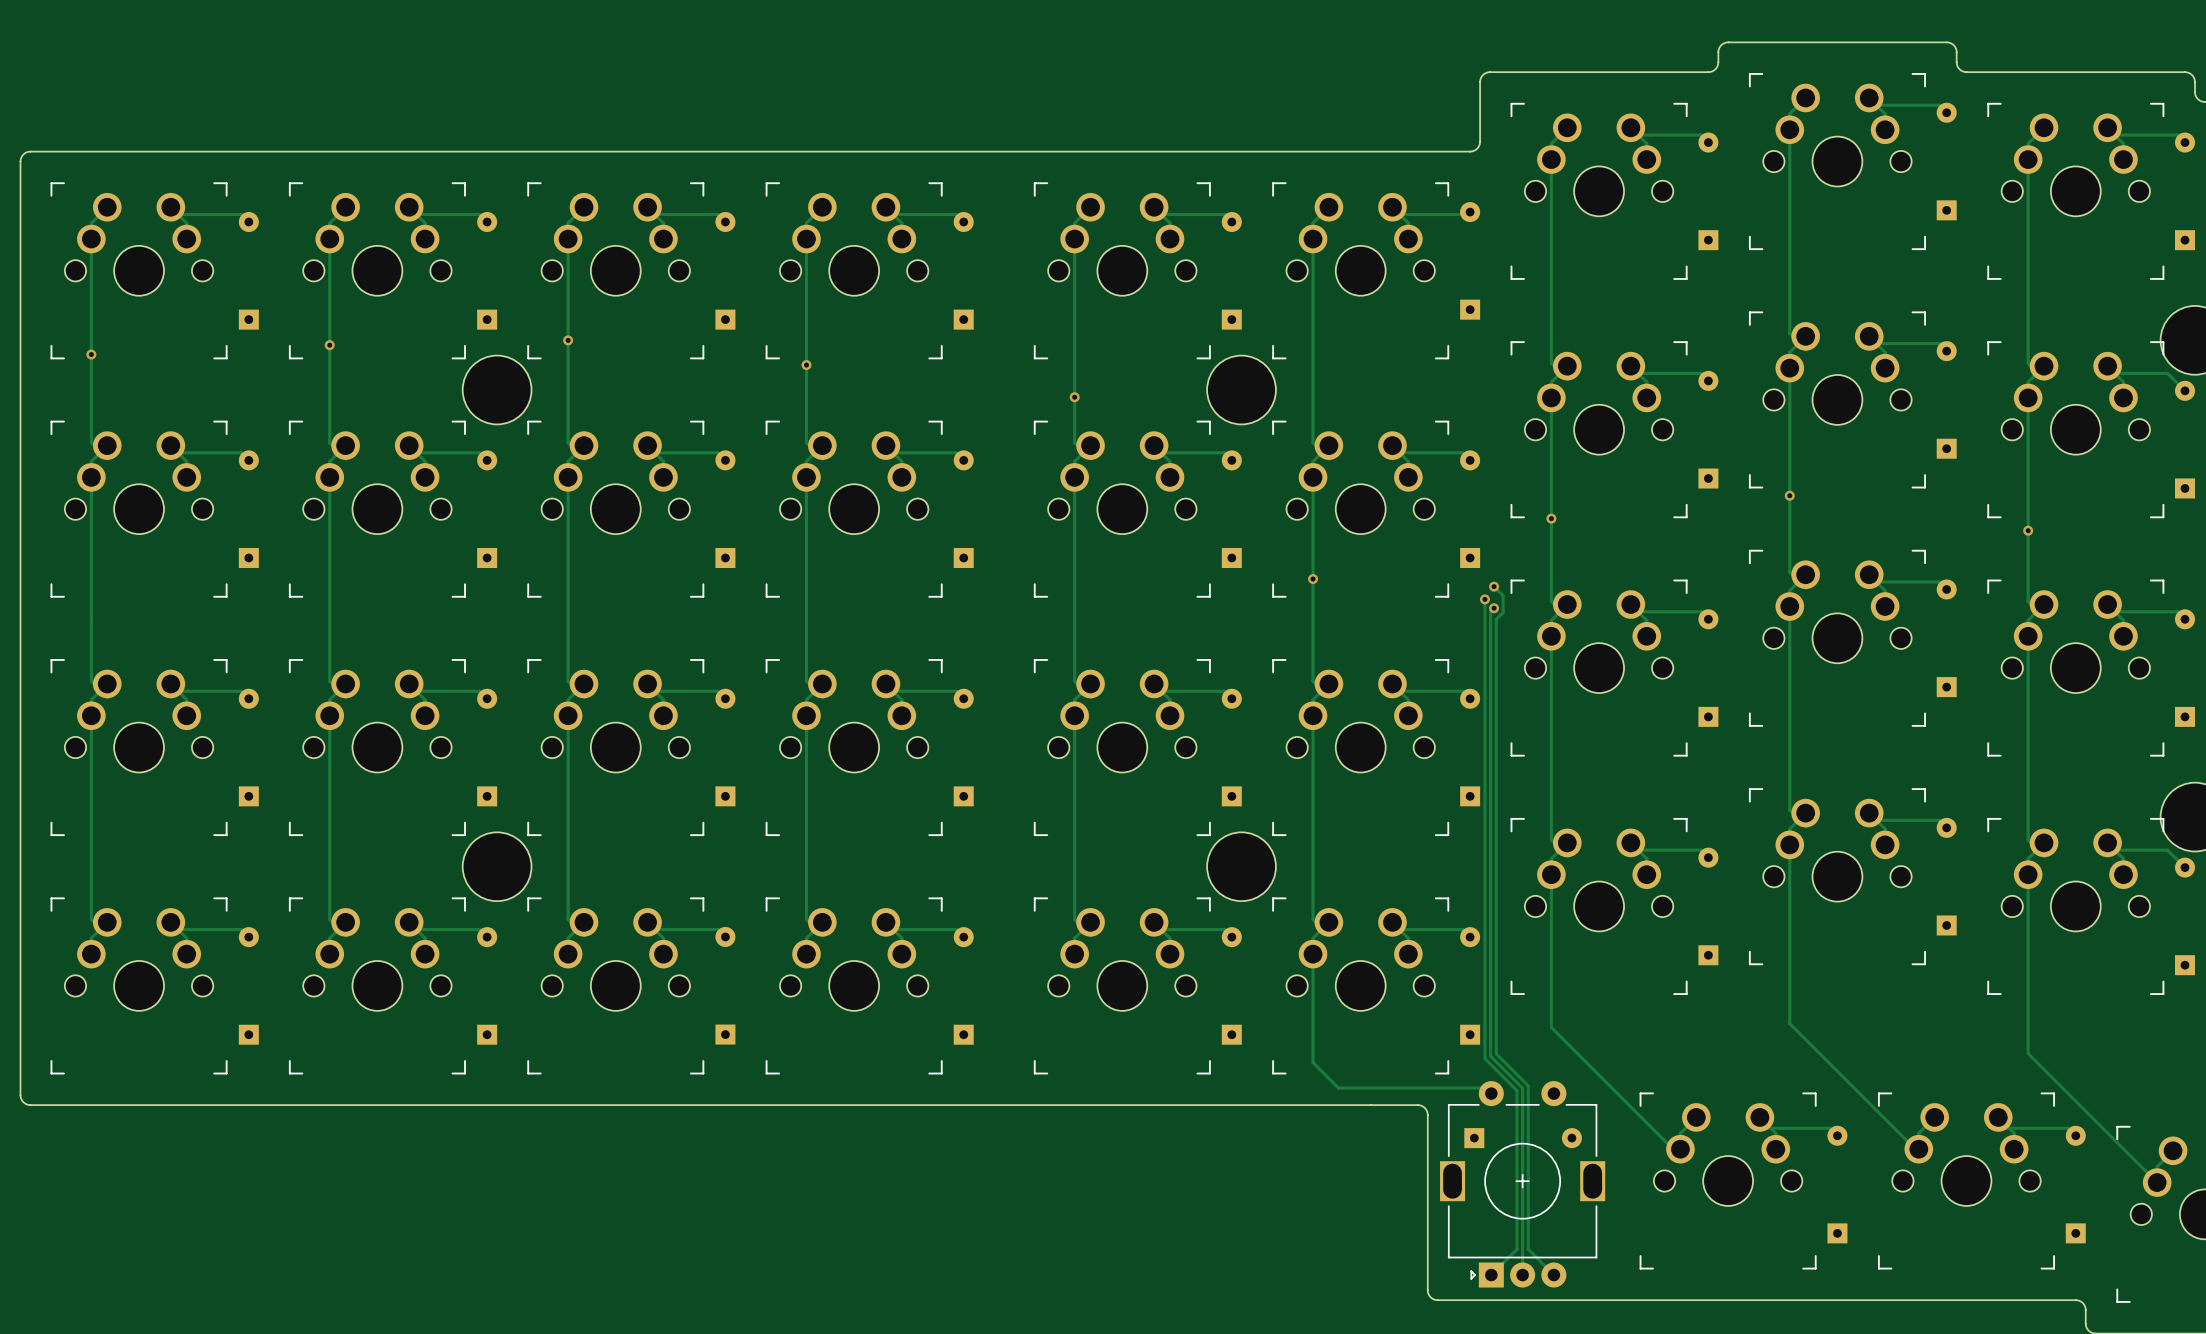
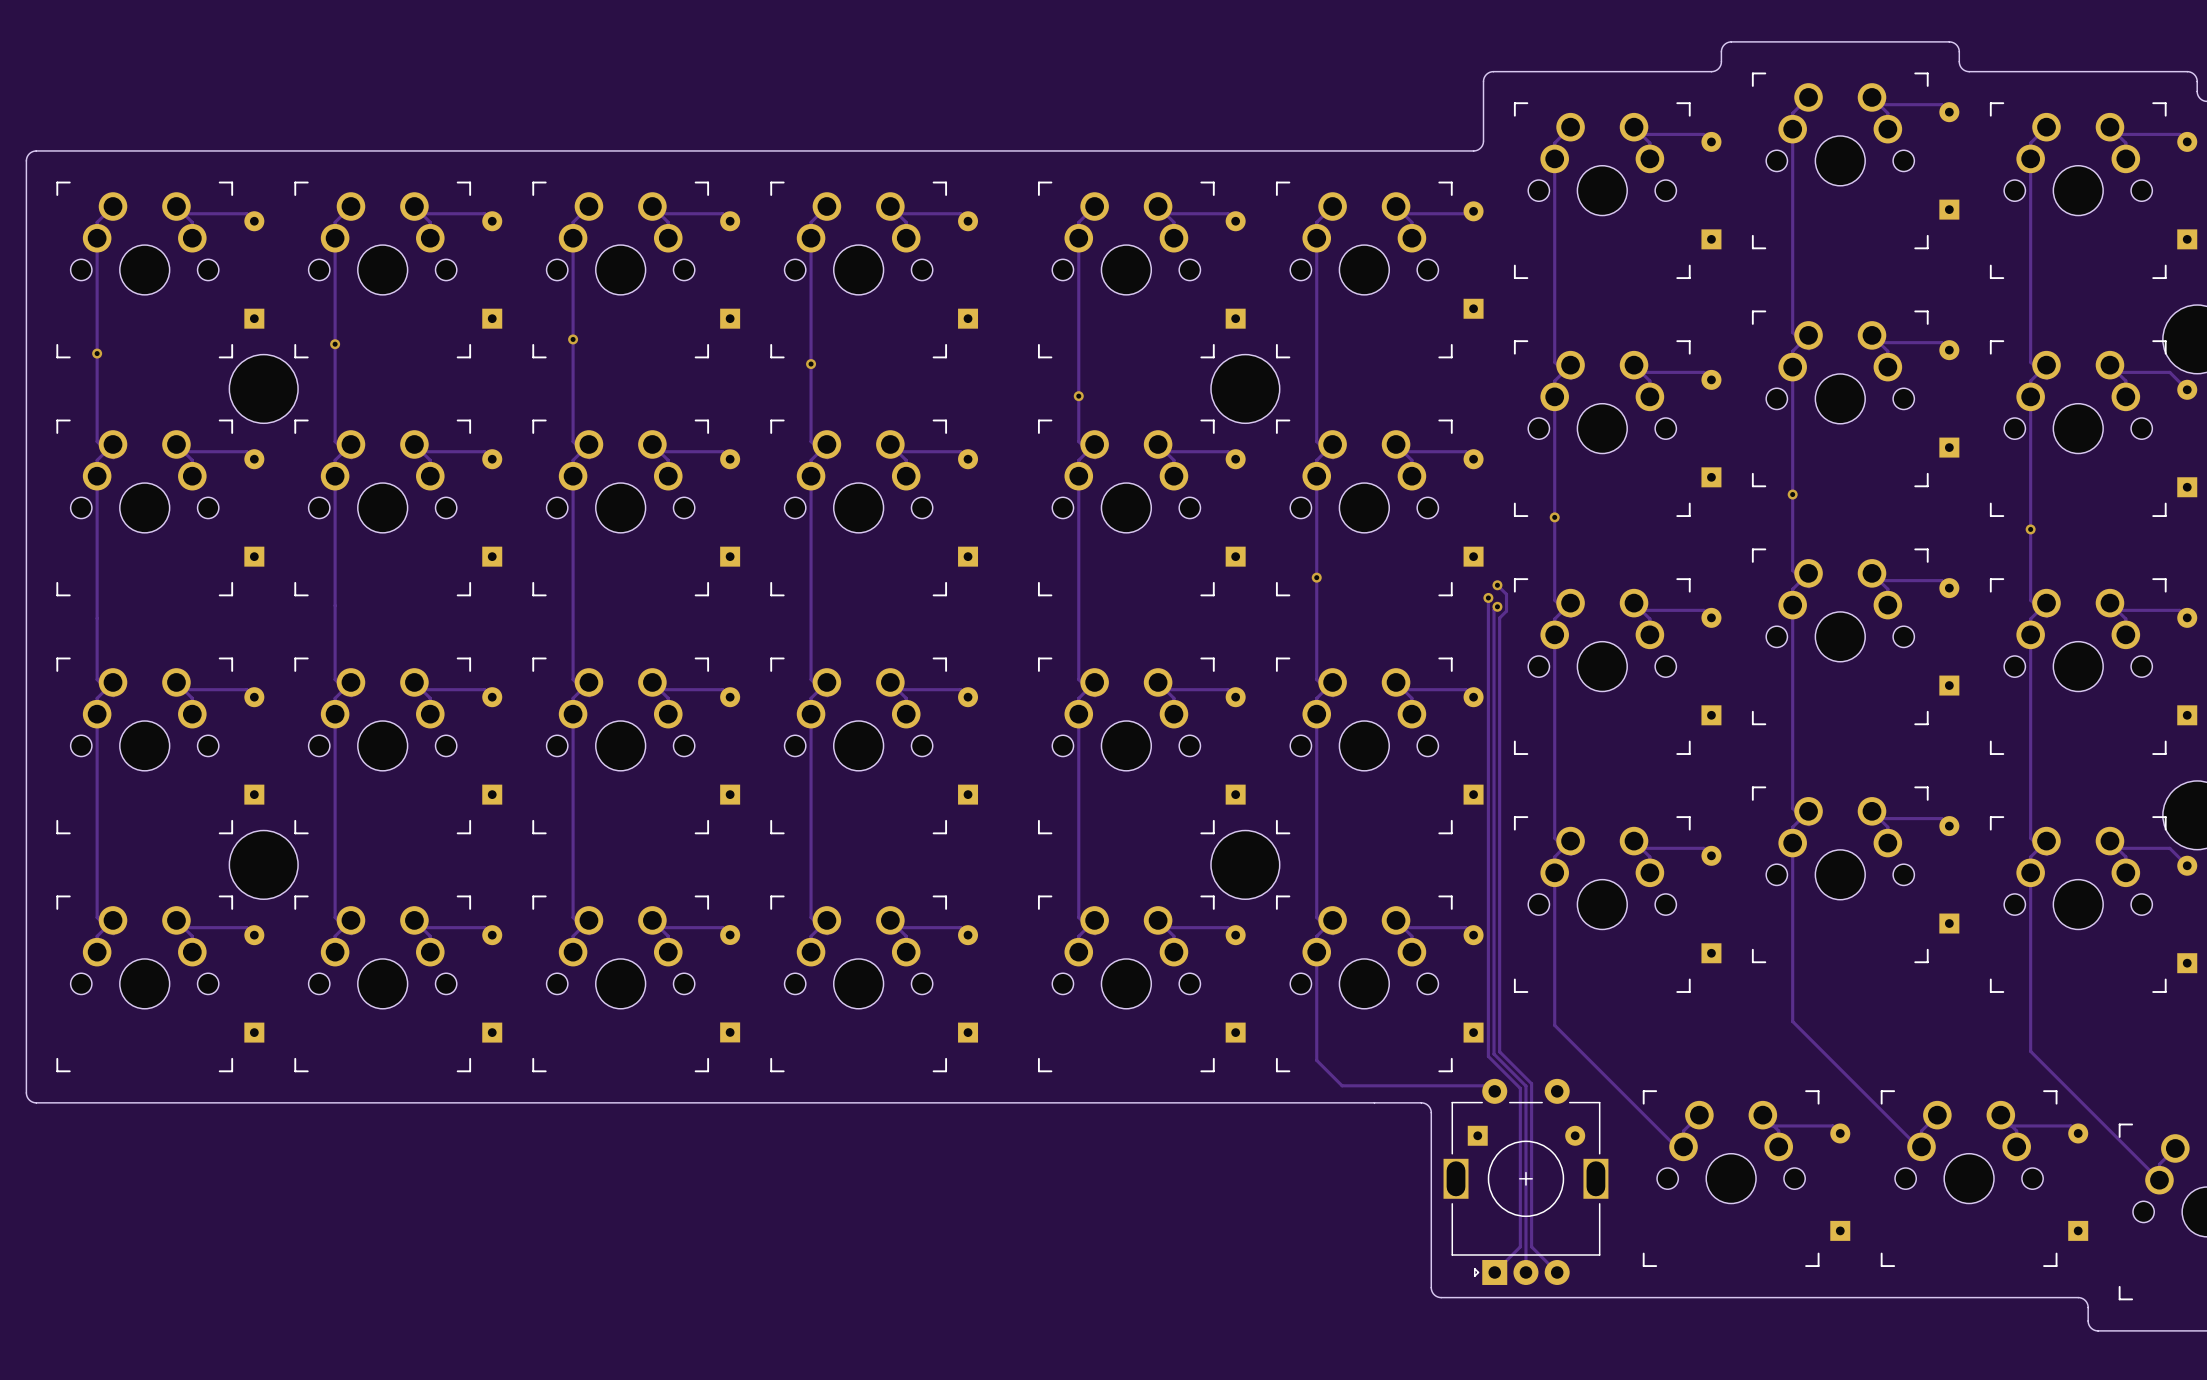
part position: (497, 389) -> (263, 388)
part position: (497, 866) -> (263, 864)

